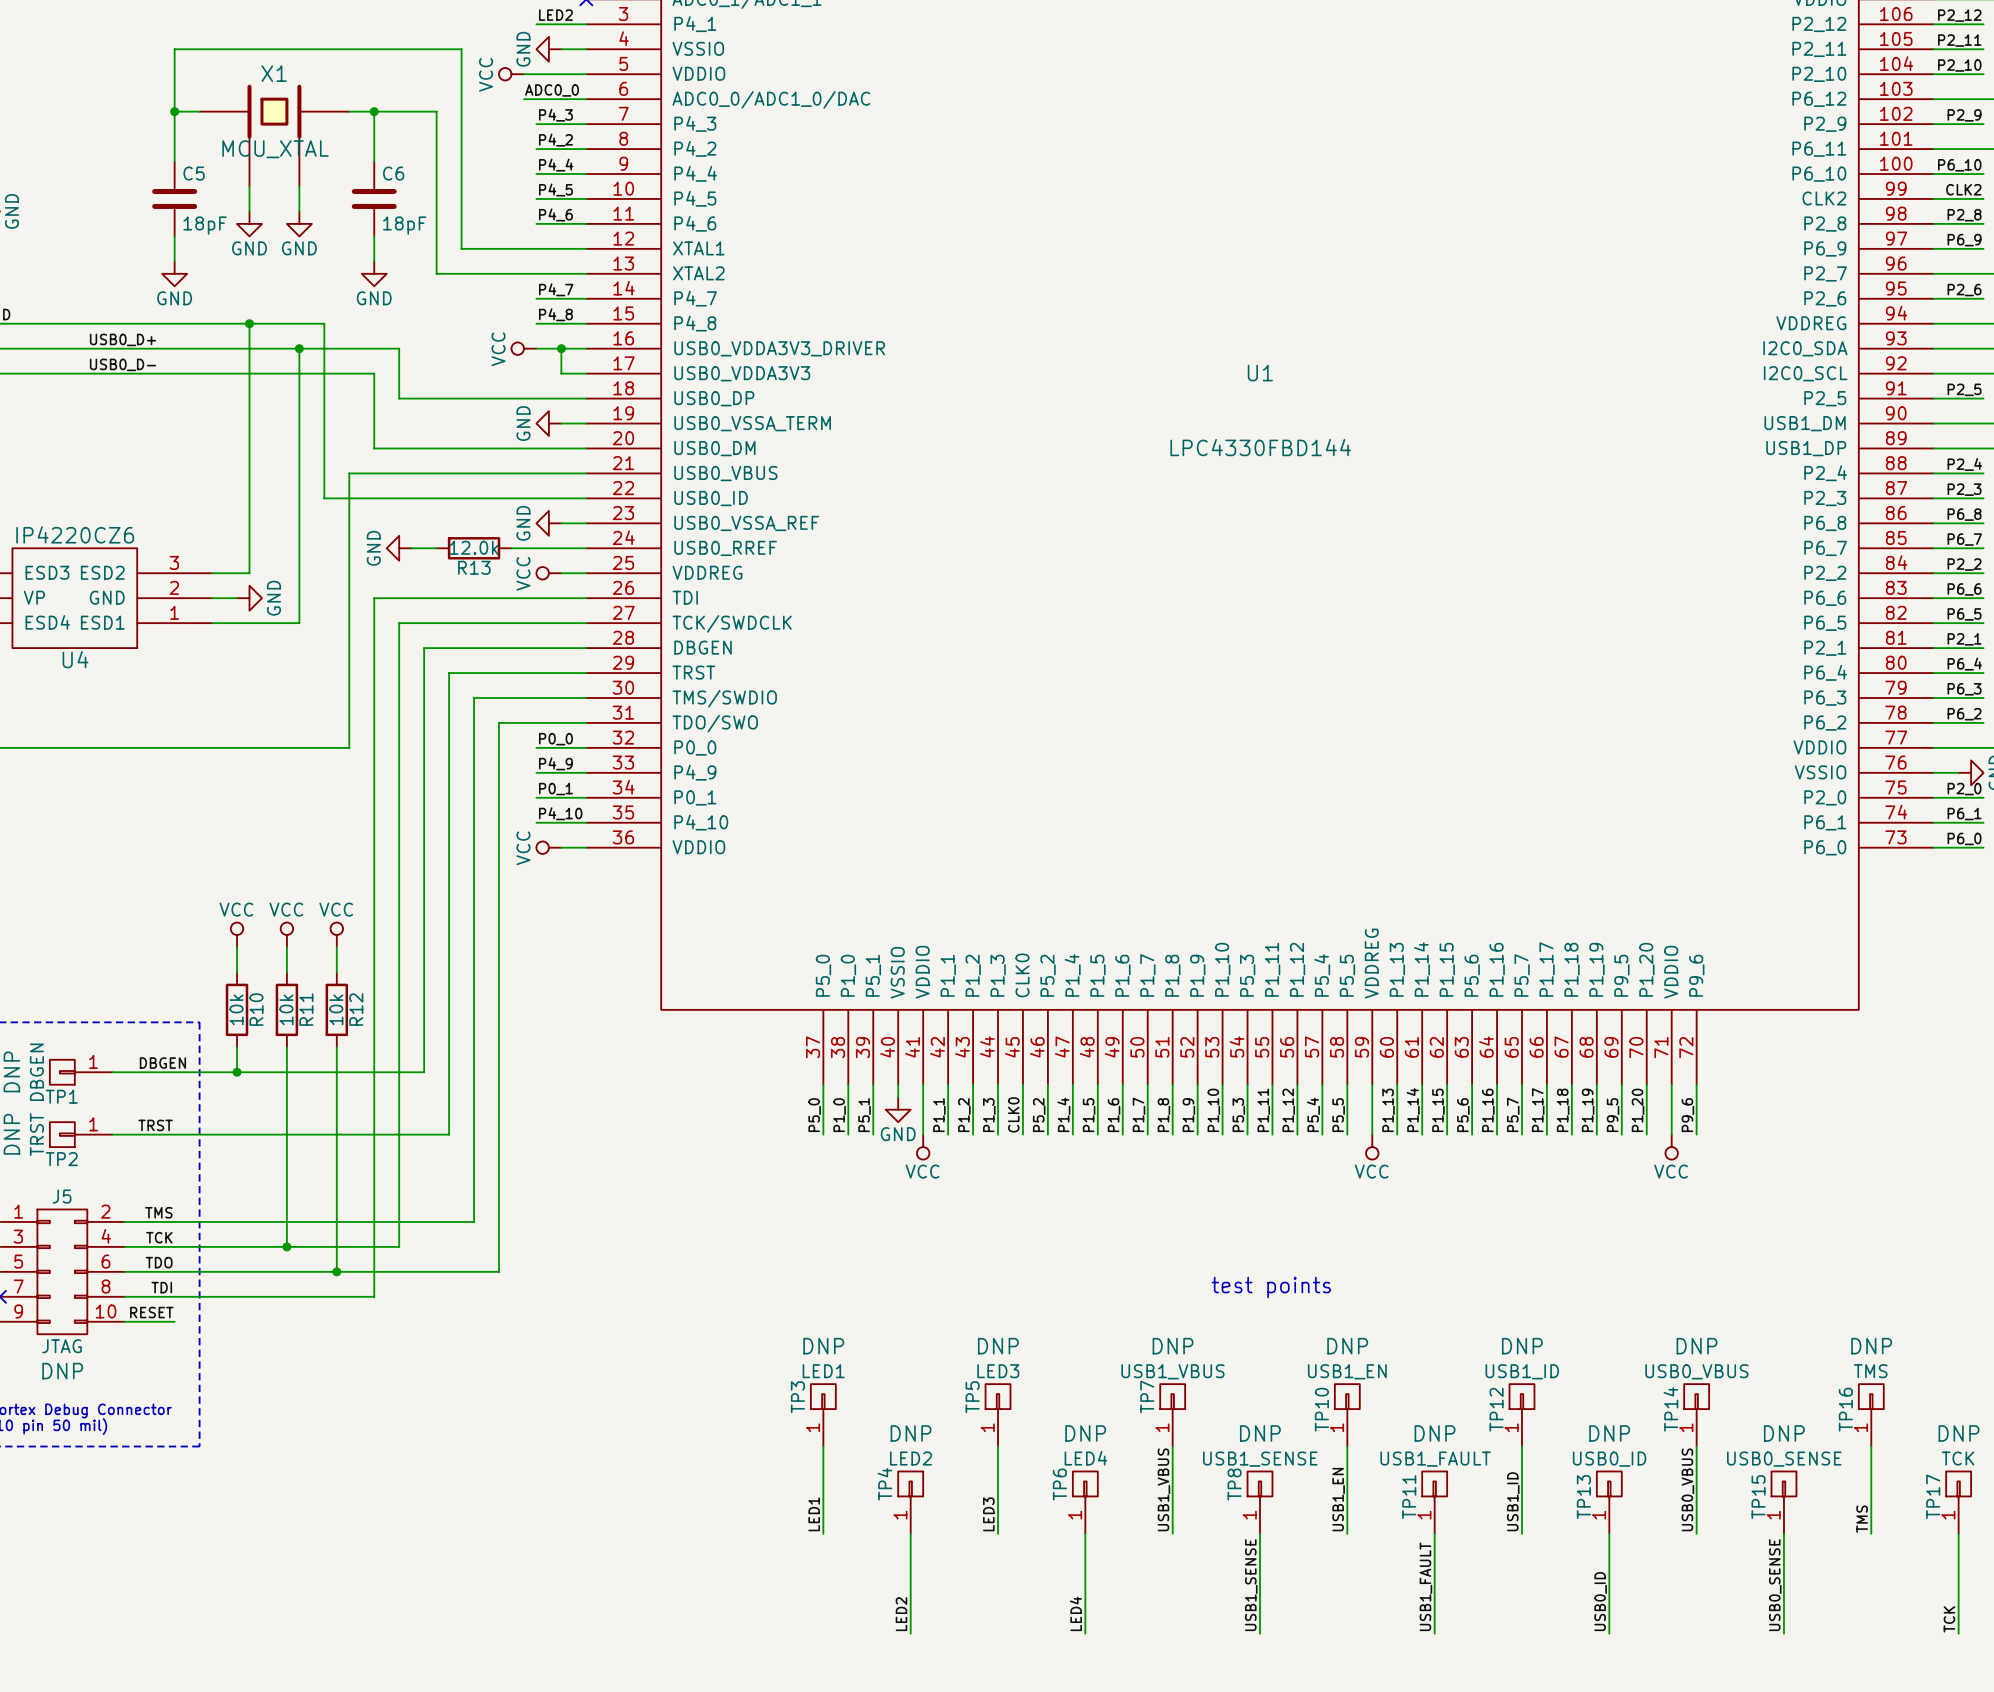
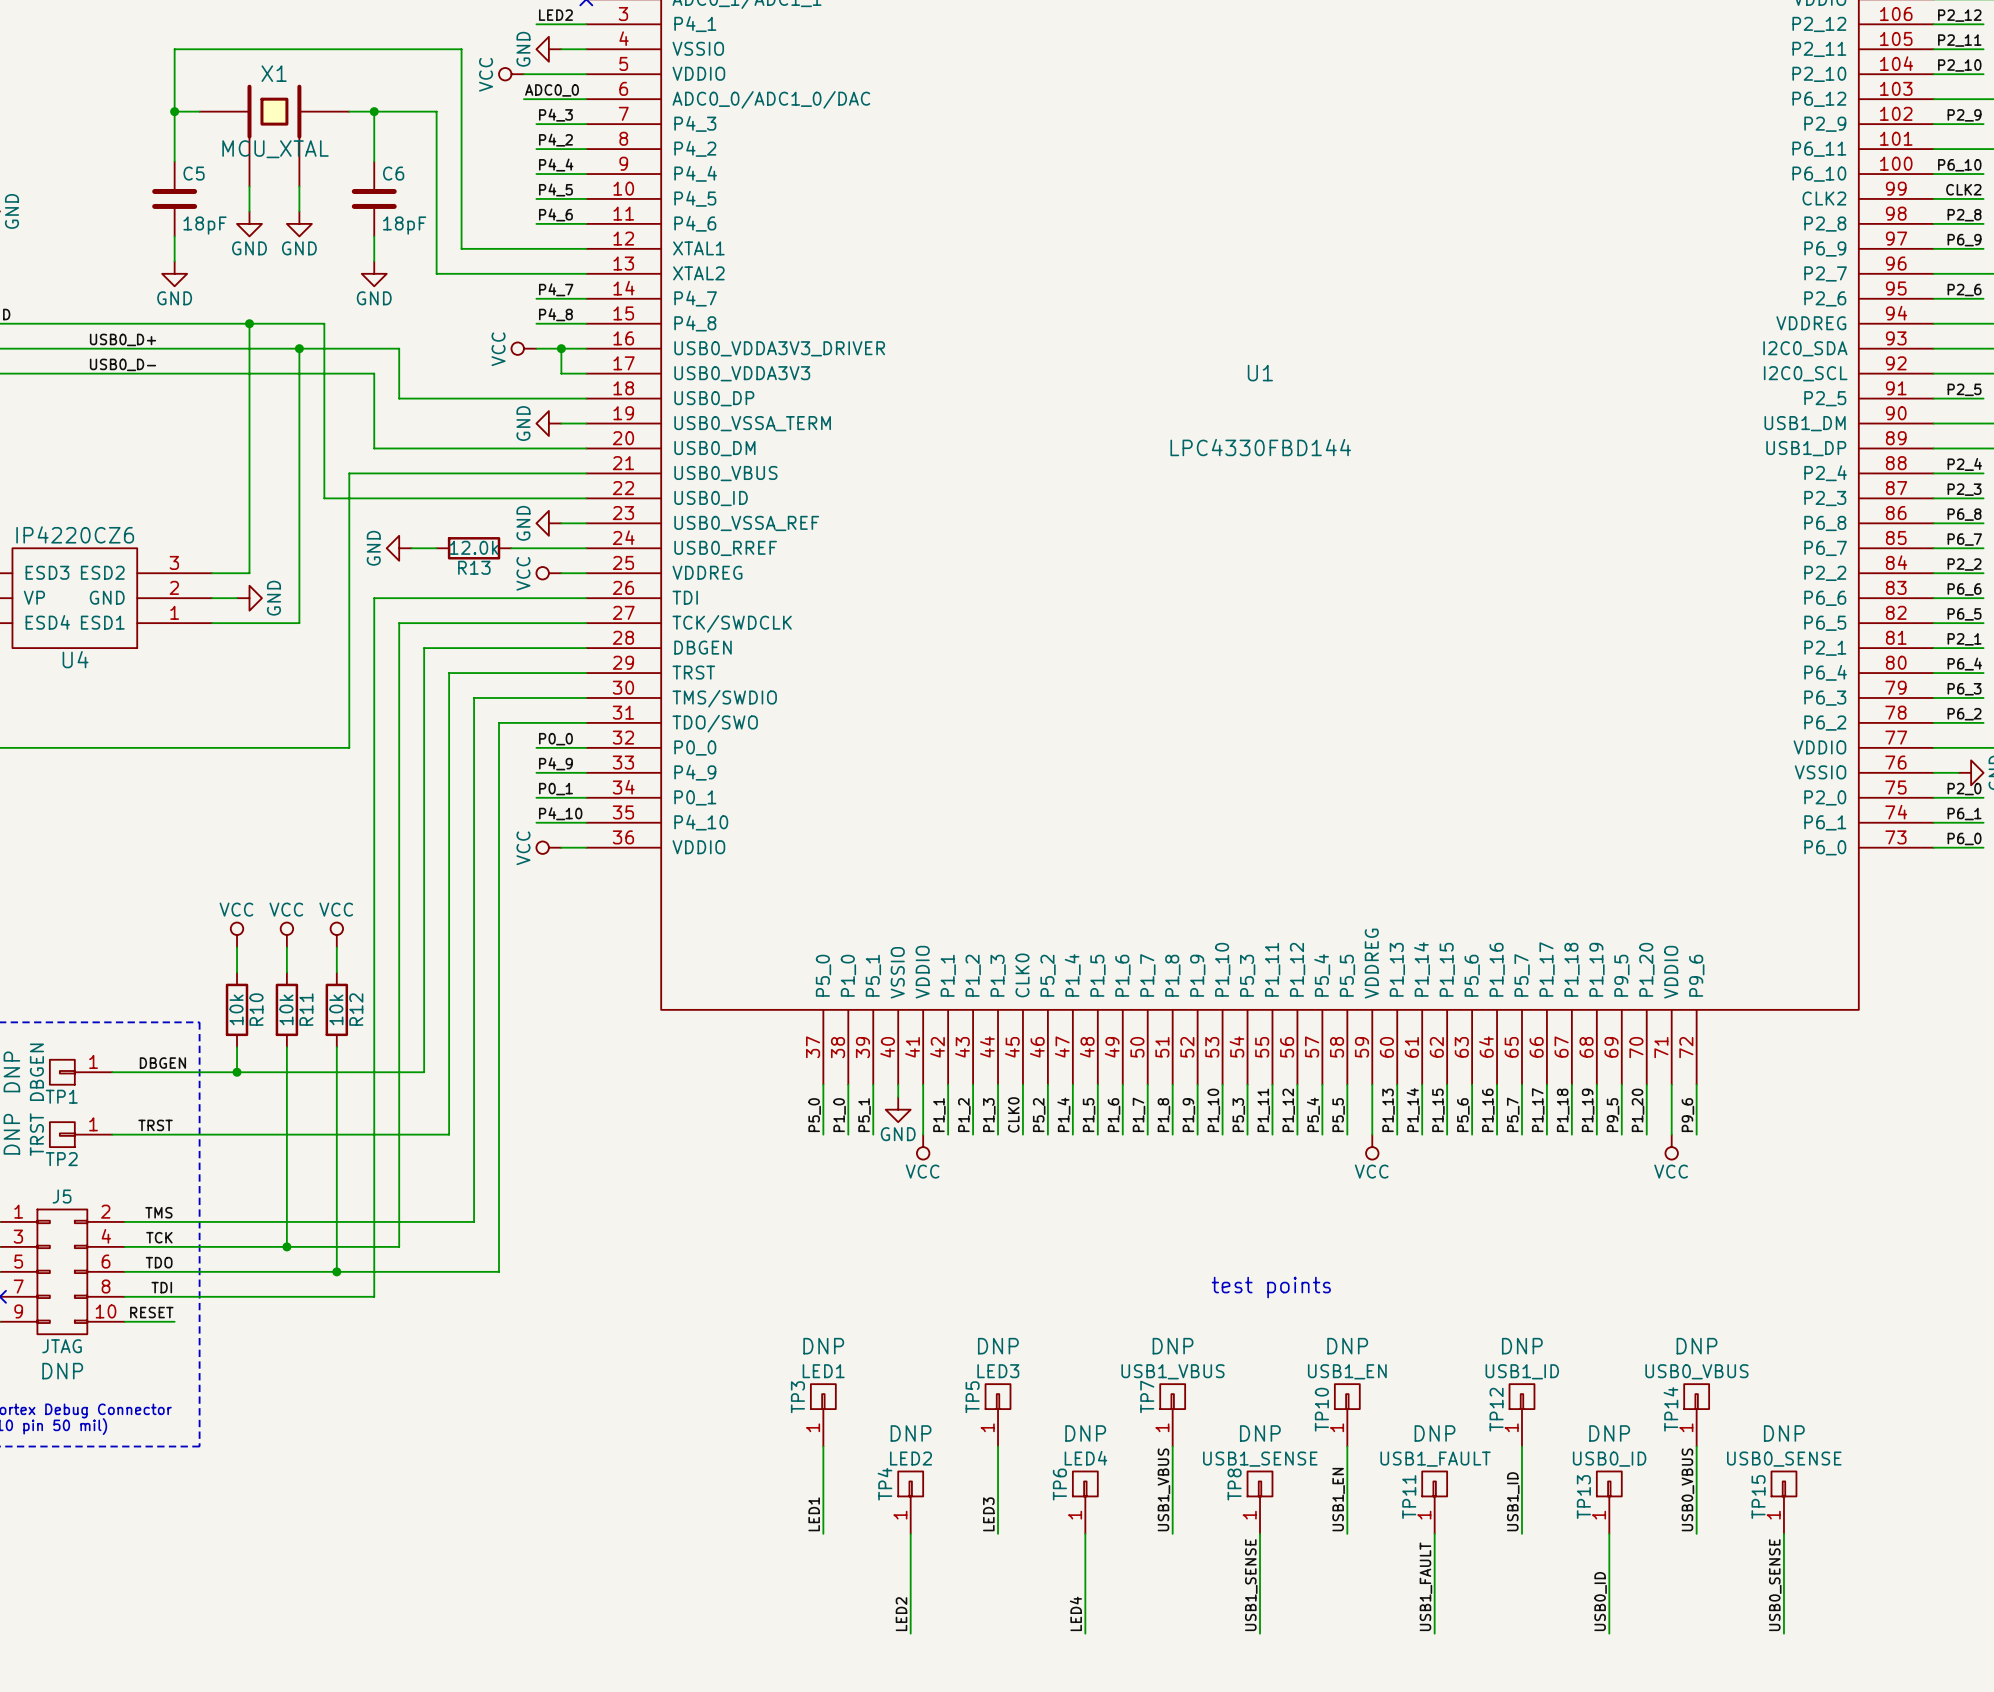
TP16: TMS (1871, 1415) -> none
wire: (1871, 1446) (1871, 1533) -> none
TP17: TCK (1958, 1502) -> none
label: TMS (1862, 1519) -> none
wire: (1958, 1533) (1958, 1633) -> none
label: TCK (1949, 1619) -> none

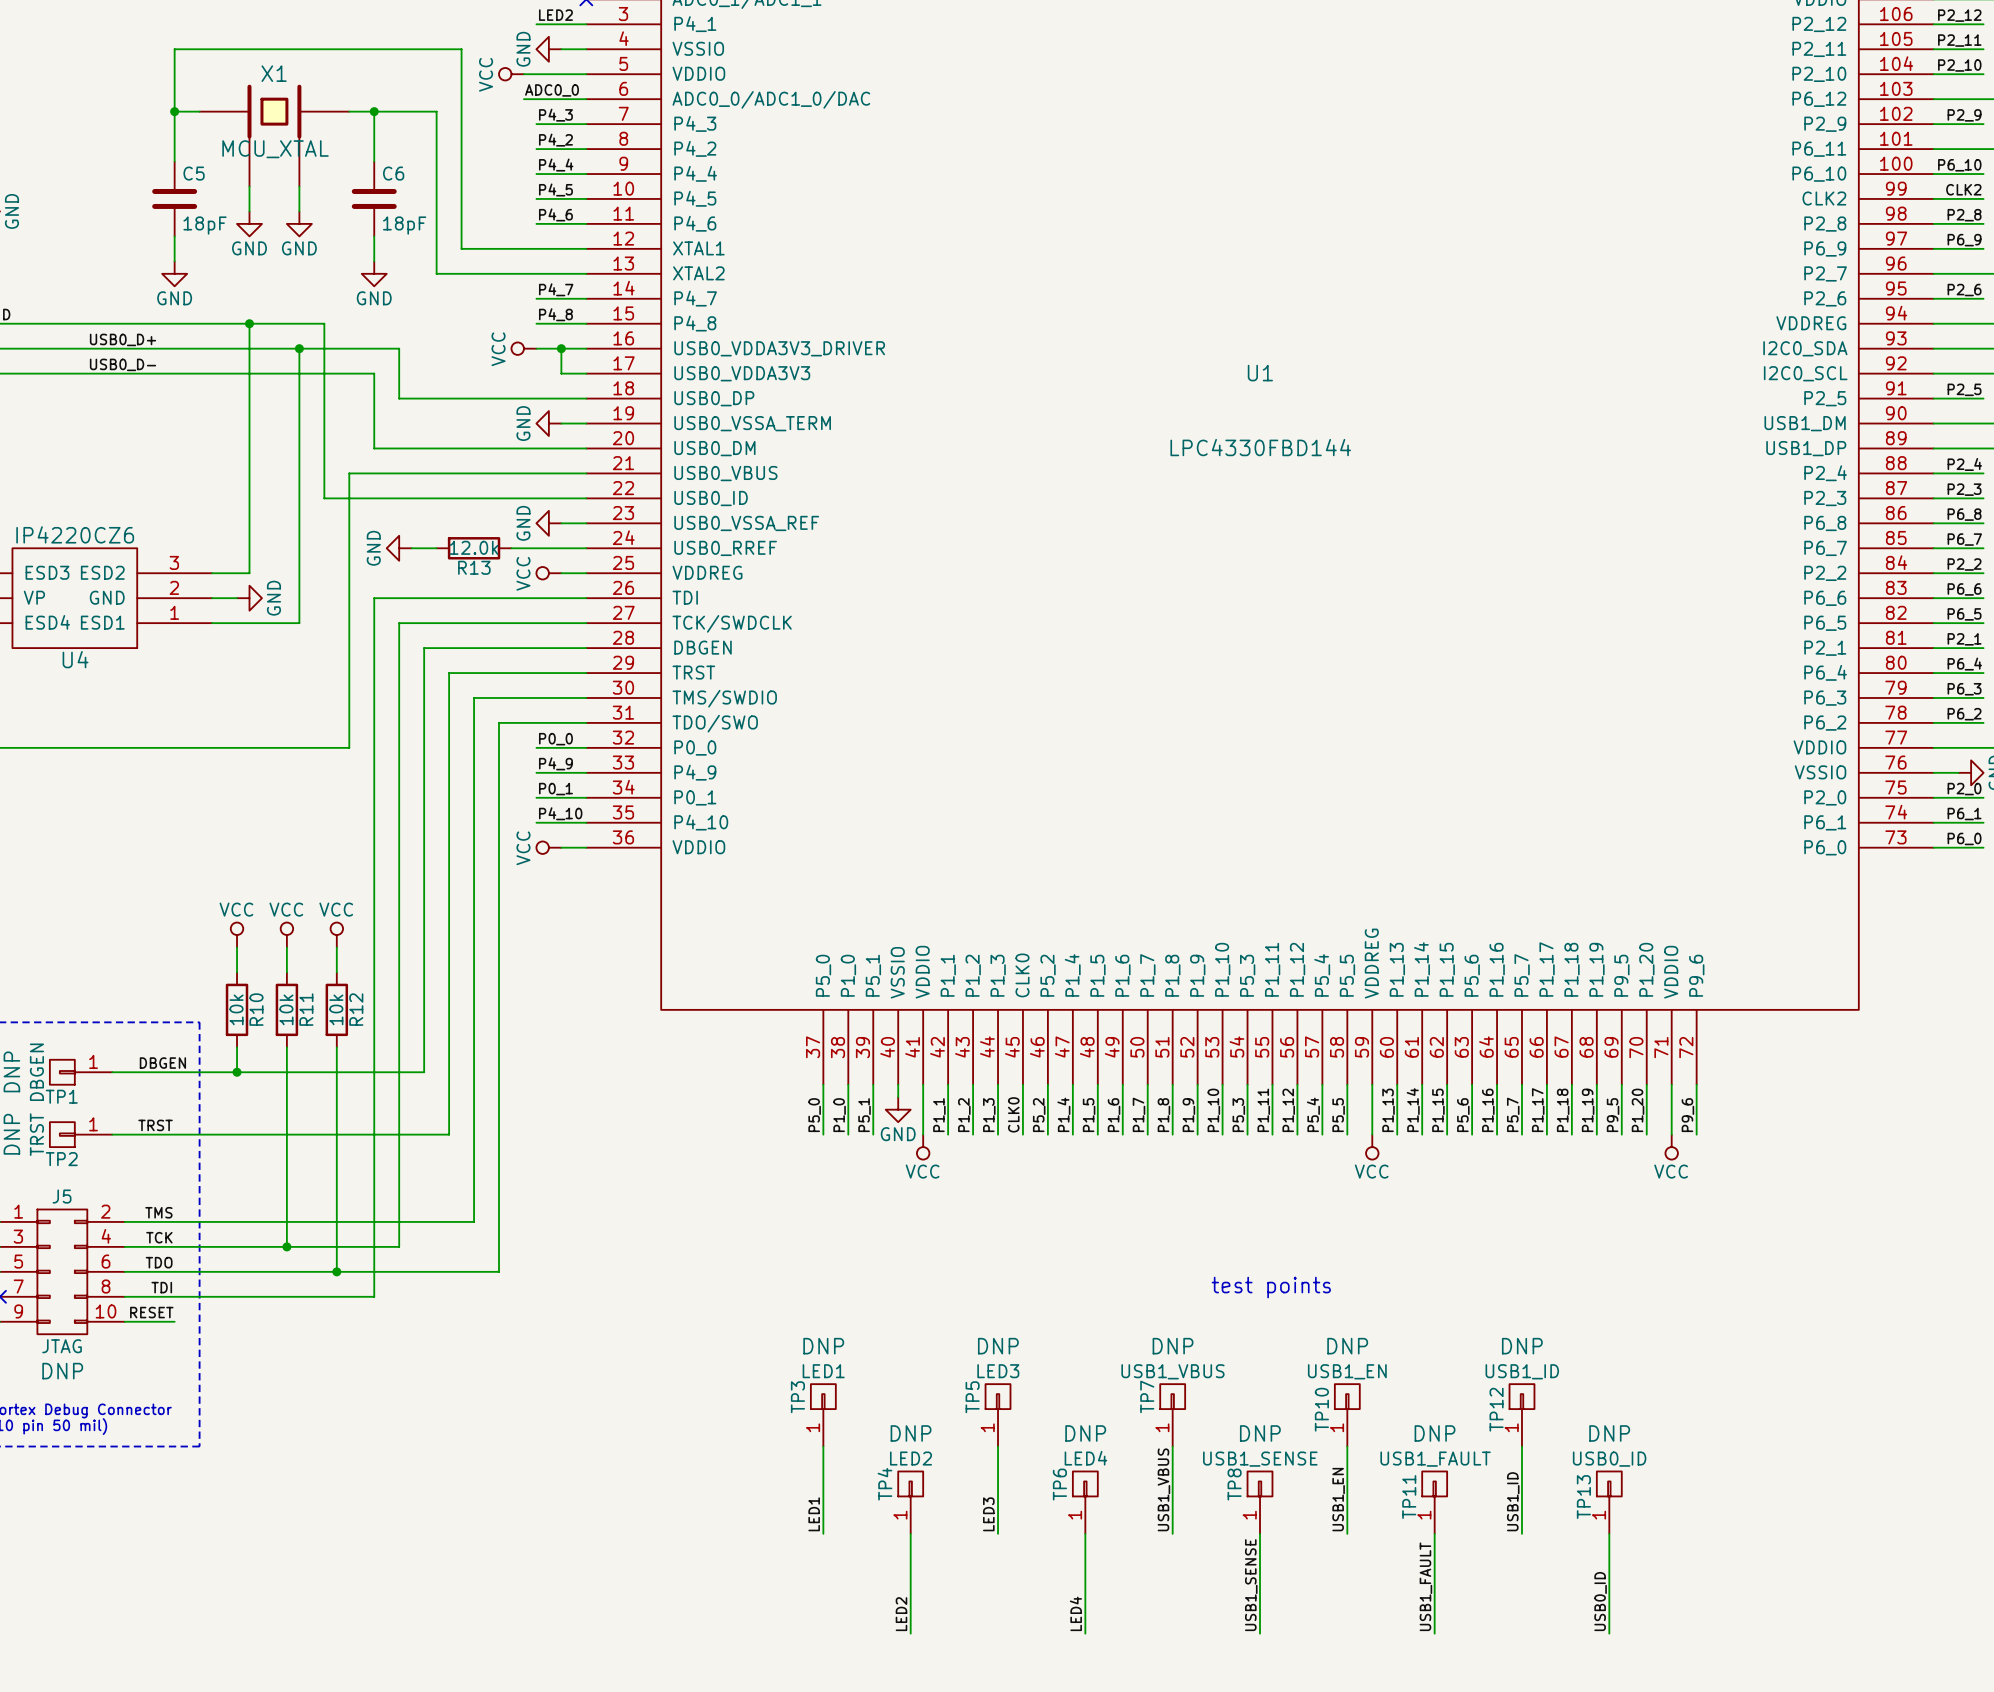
TP14: USB0_VBUS (1696, 1415) -> none
wire: (1696, 1446) (1696, 1533) -> none
label: USB0_VBUS (1687, 1489) -> none
TP15: USB0_SENSE (1783, 1502) -> none
wire: (1783, 1533) (1783, 1633) -> none
label: USB0_SENSE (1775, 1585) -> none

